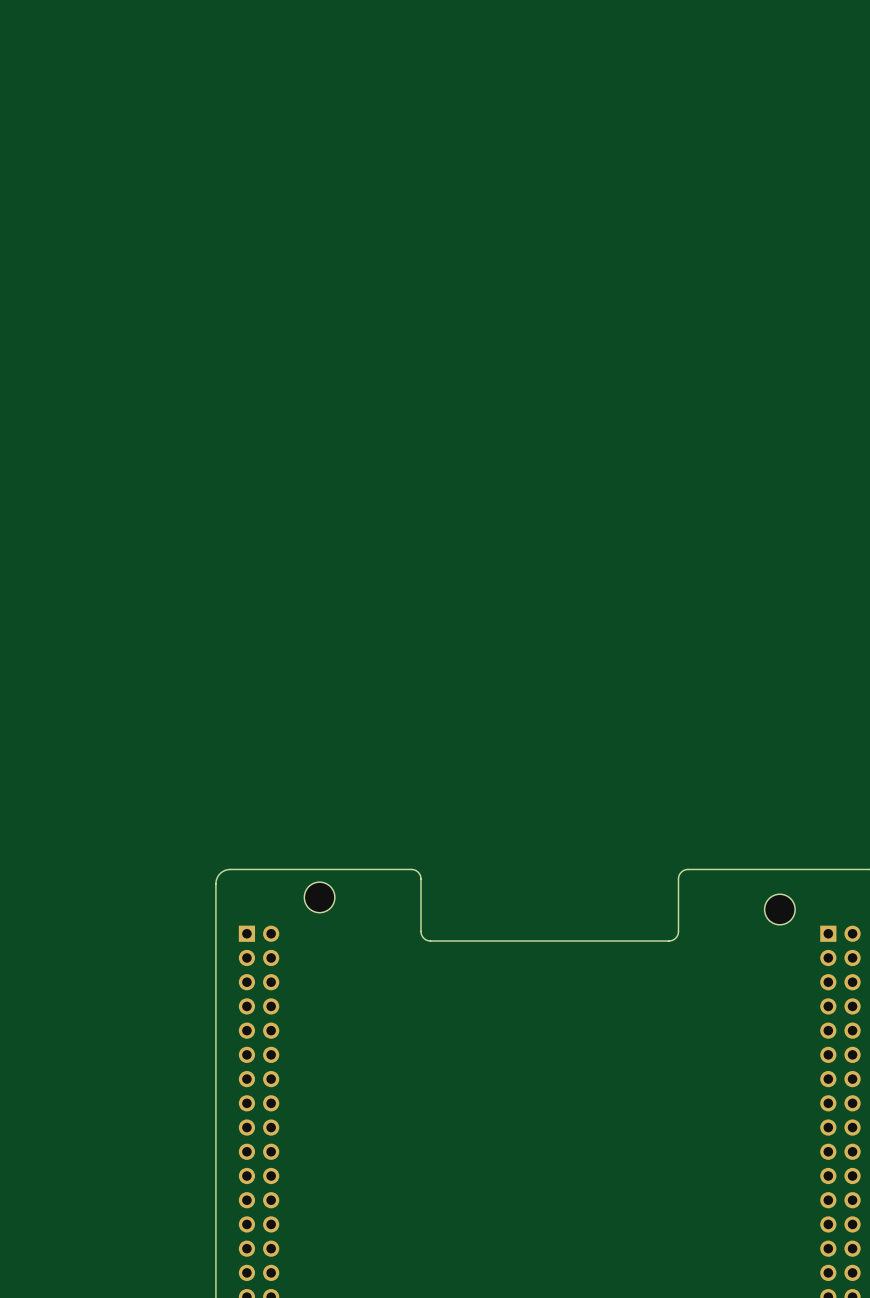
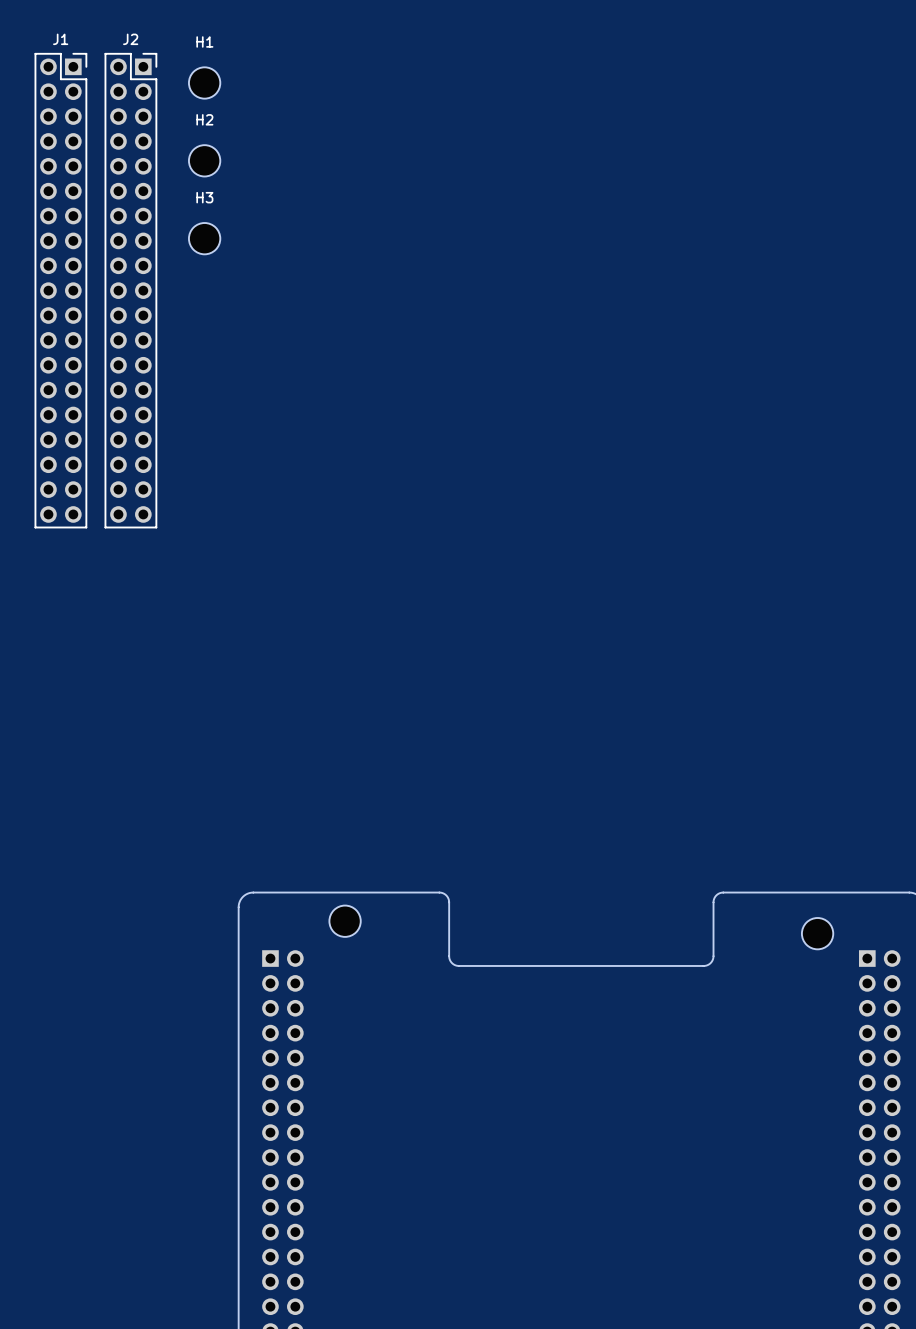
H1: none -> (204, 82)
H2: none -> (204, 160)
H3: none -> (204, 238)
J1: none -> (60, 290)
J2: none -> (130, 290)

